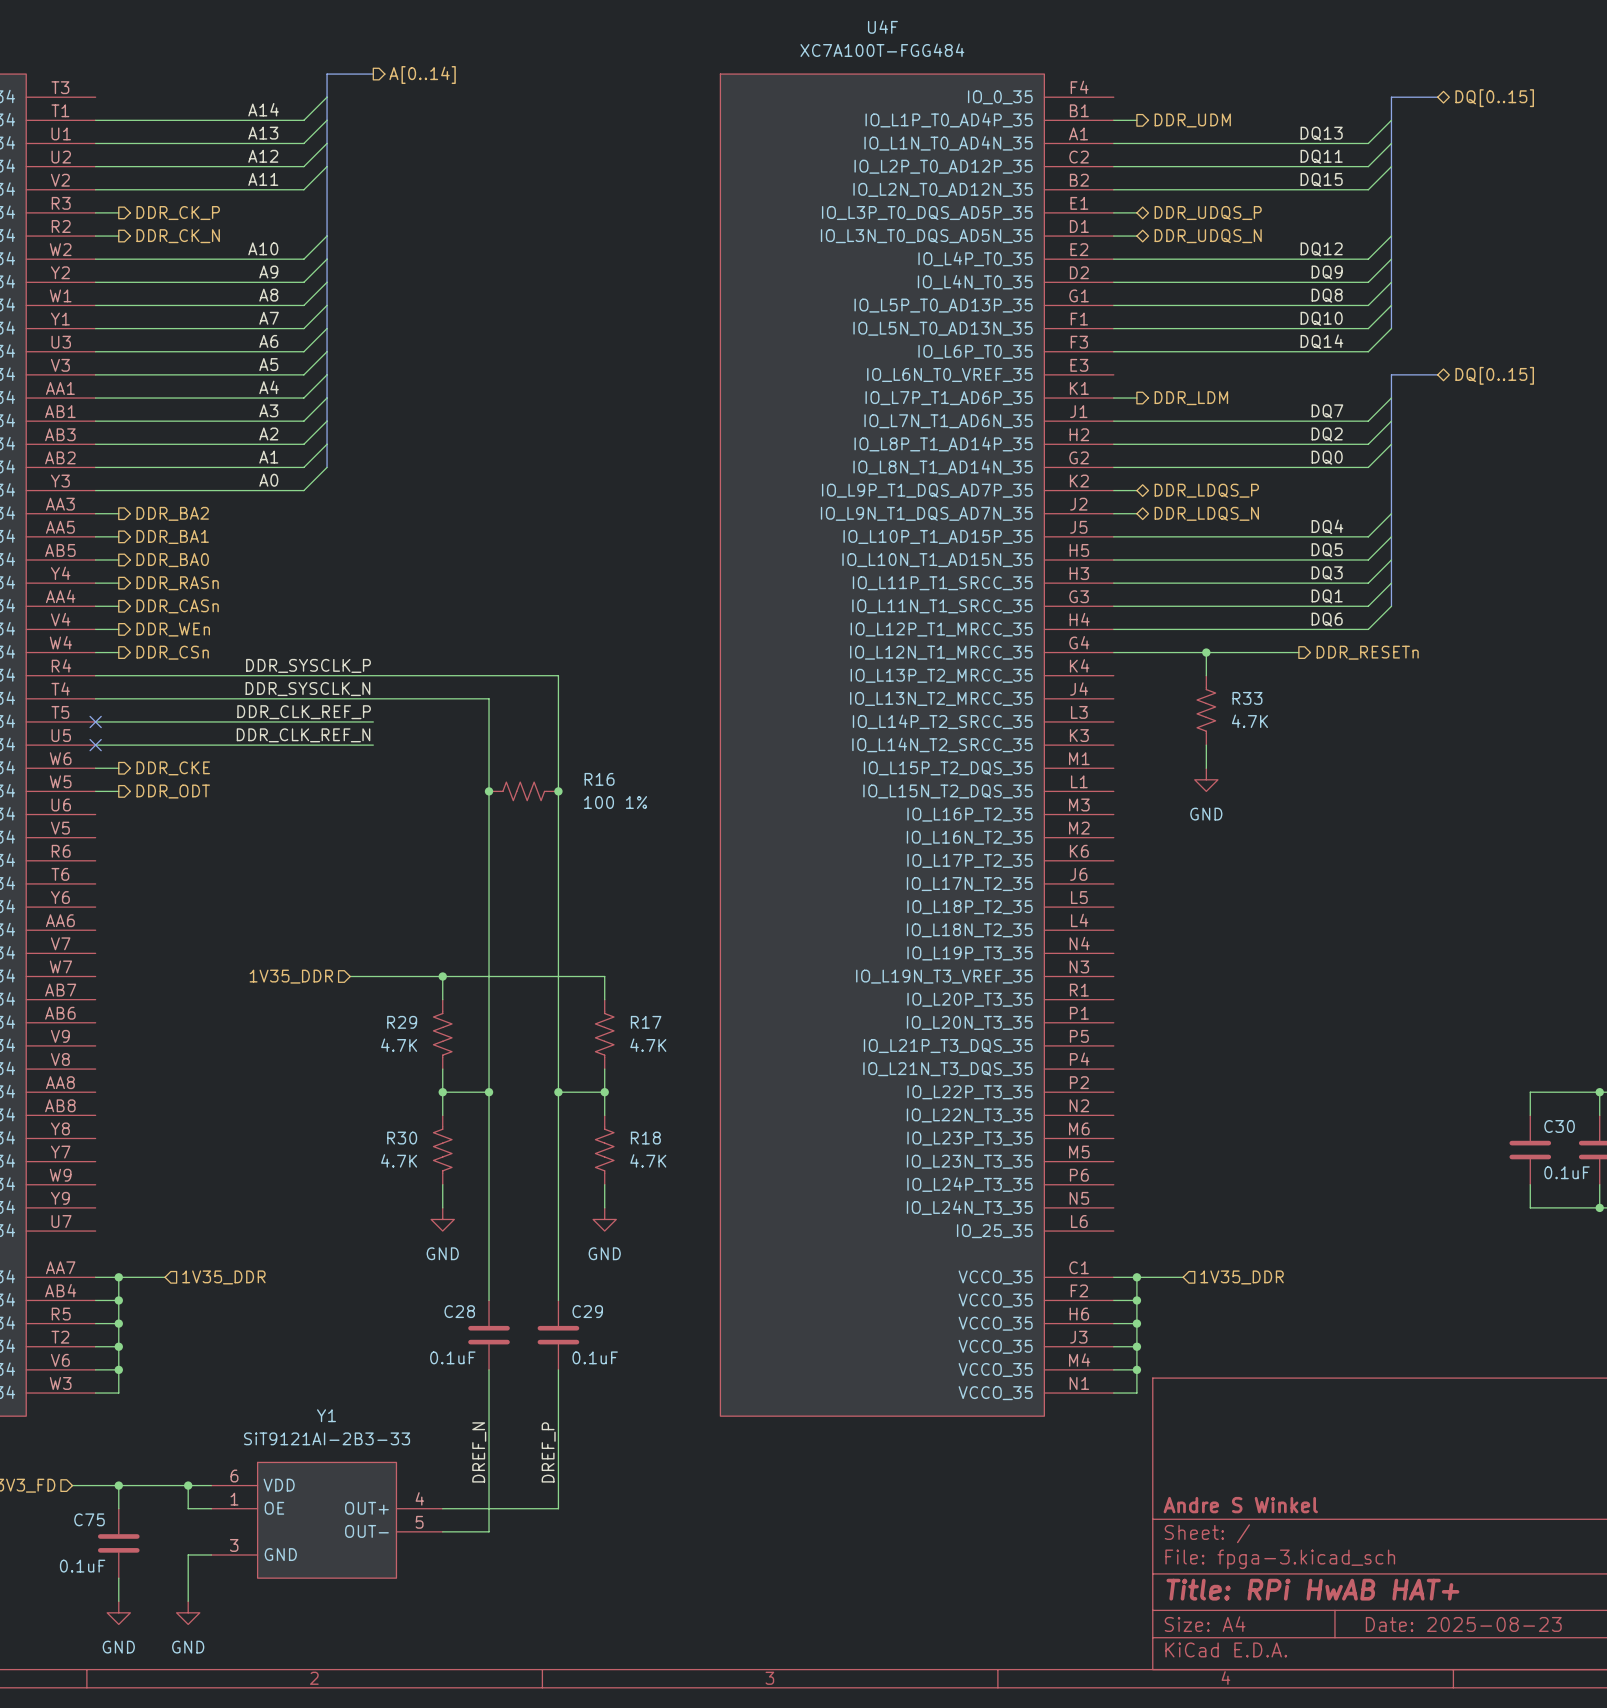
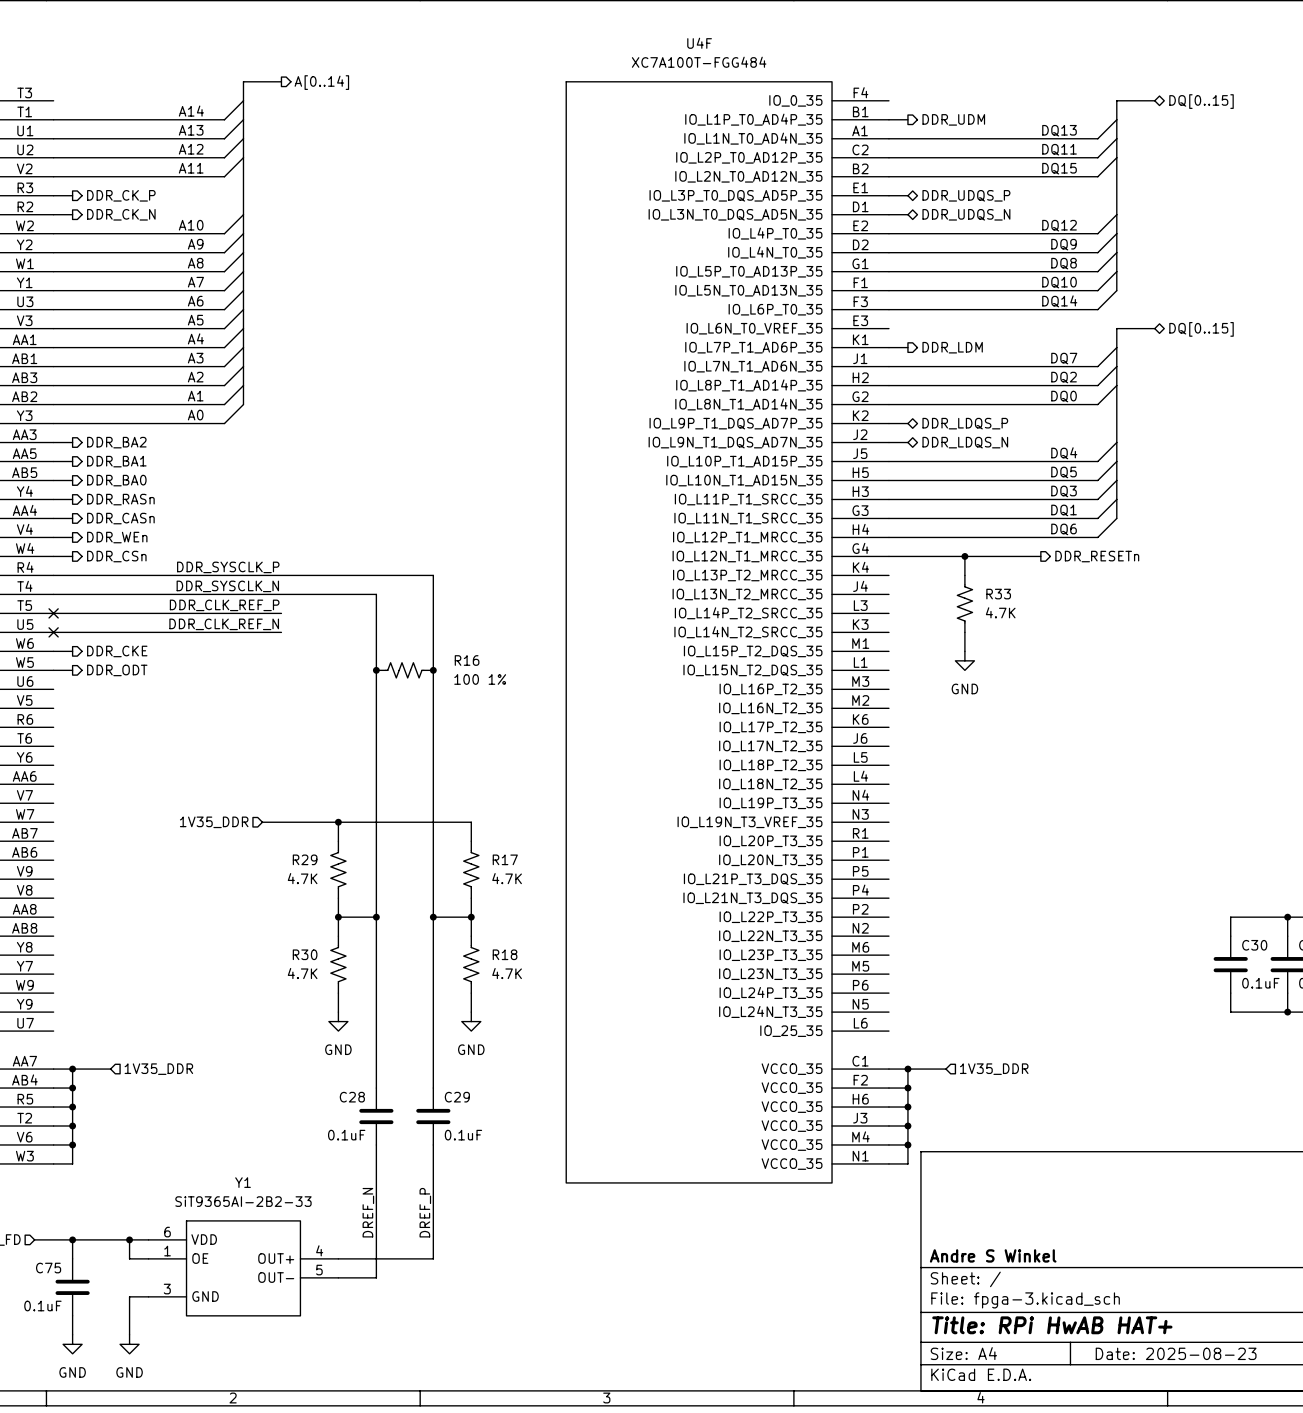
Y1 value: SiT9121AI-2B3-33 (327, 1438) -> SiT9365AI-2B2-33 (243, 1201)

